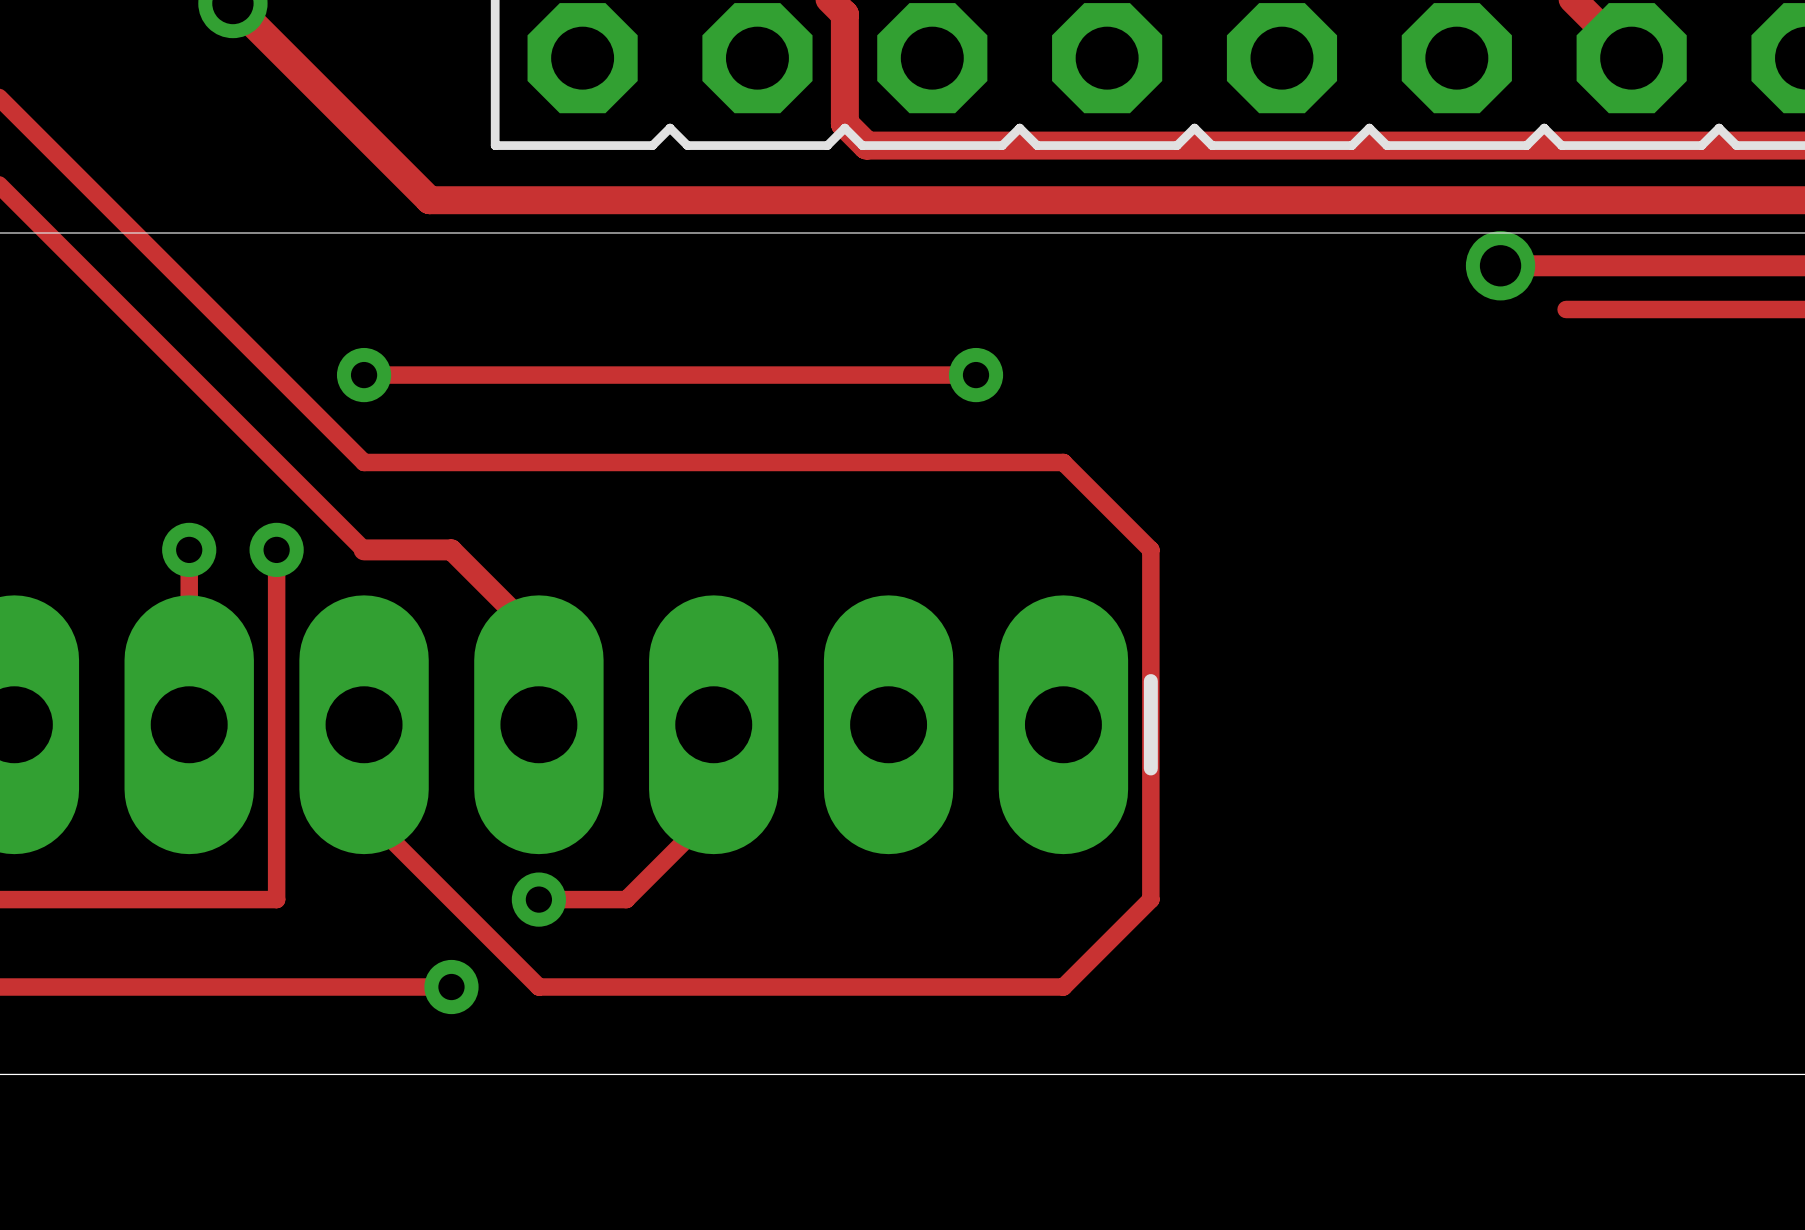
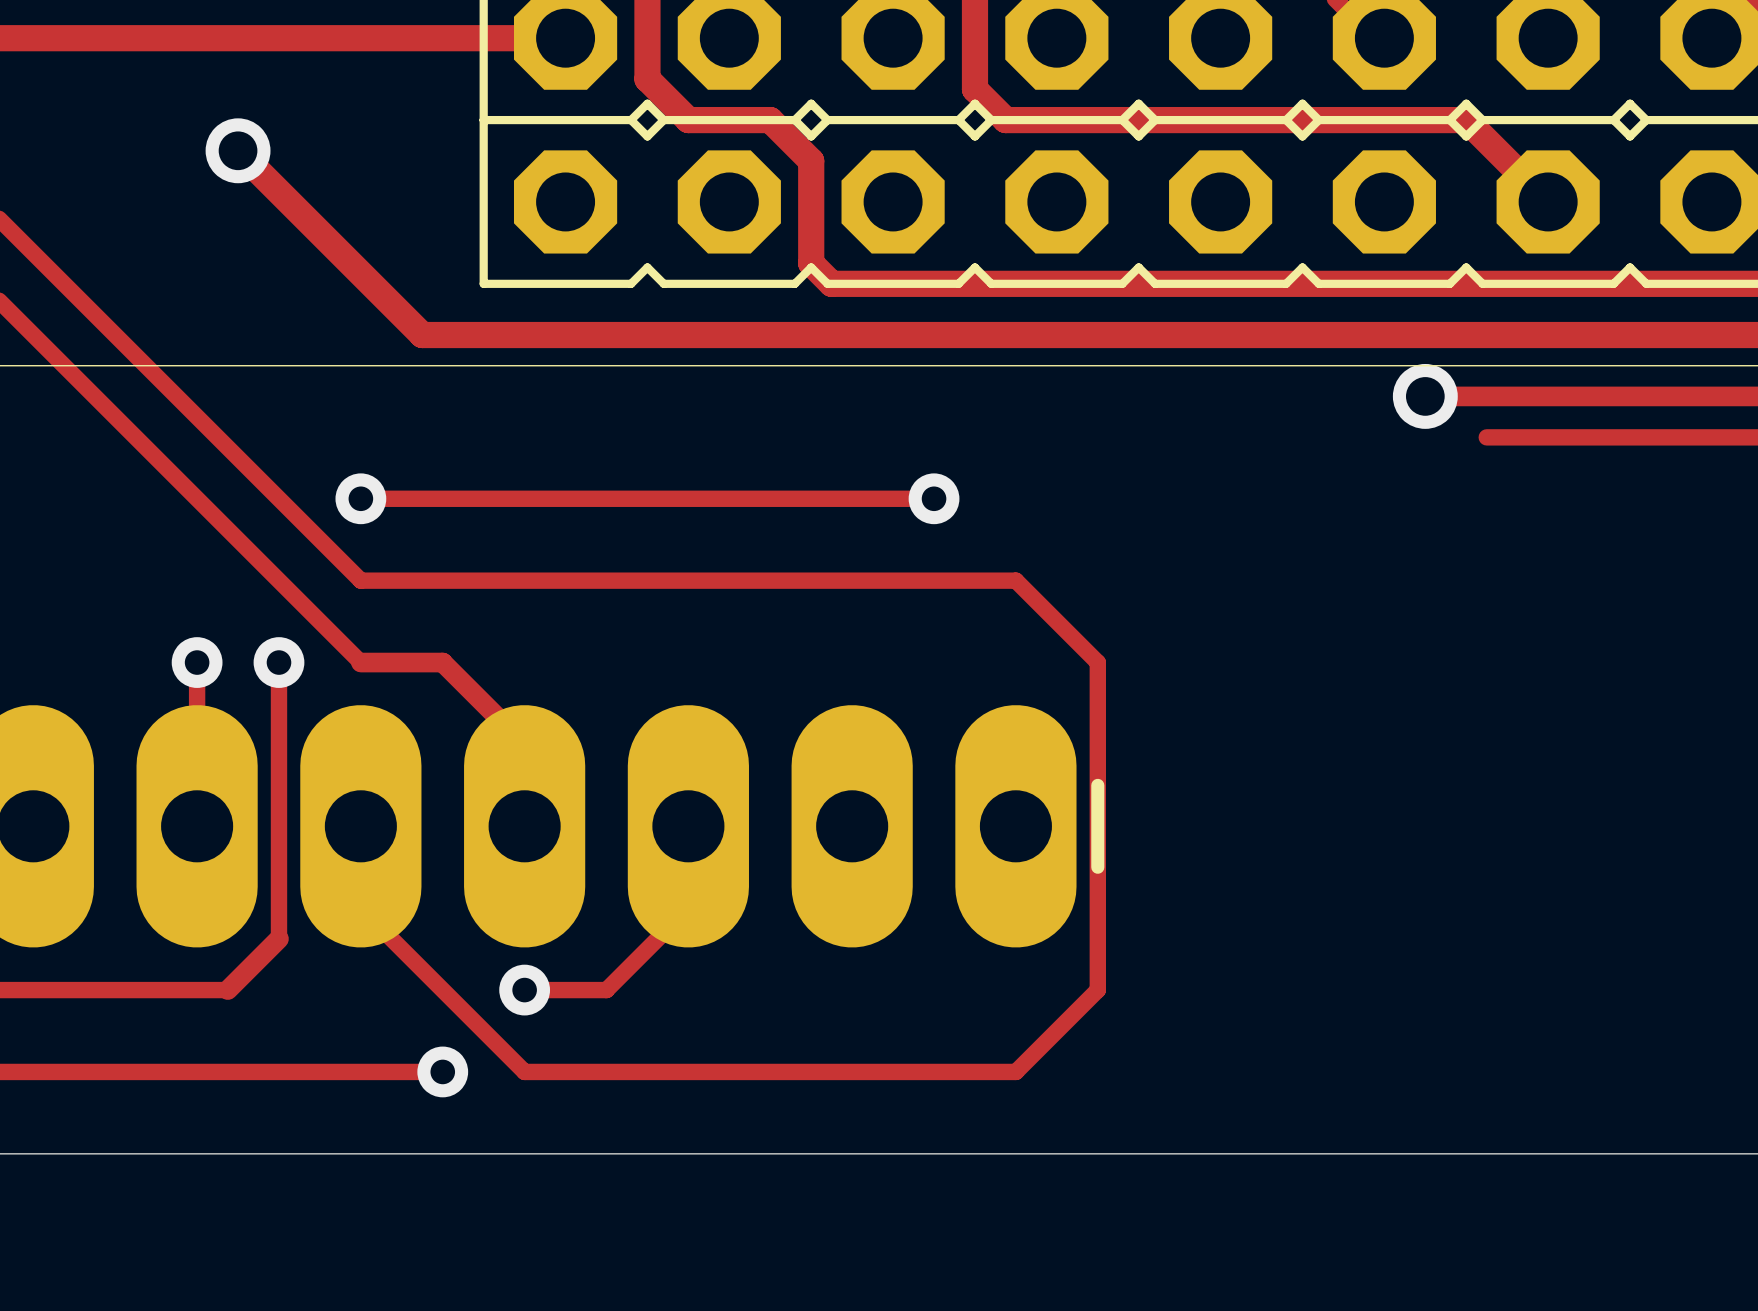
track: (276, 844) (276, 899) (222, 899) -> (278, 938) (227, 990)

